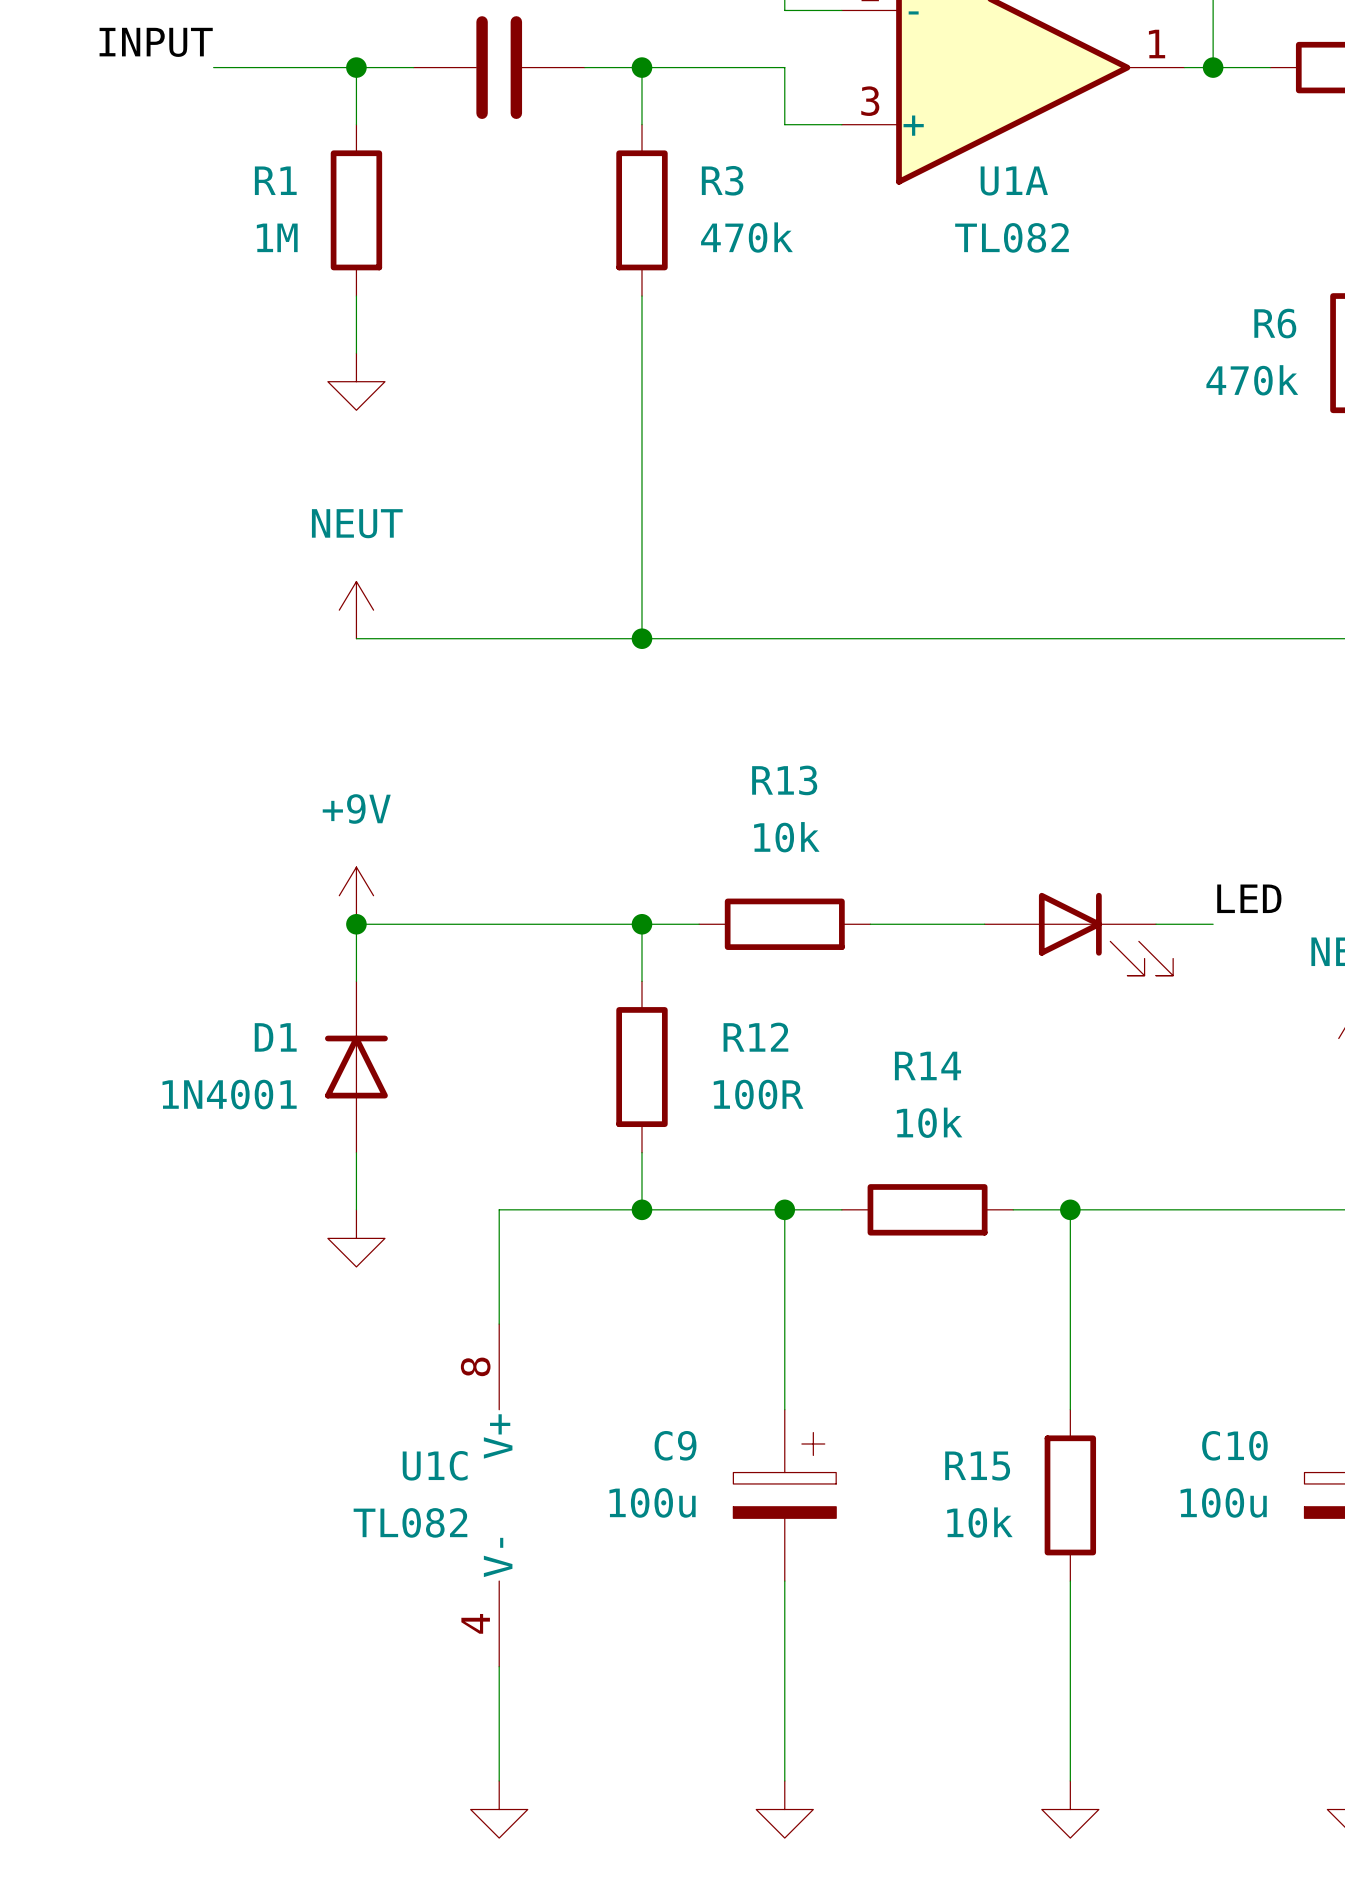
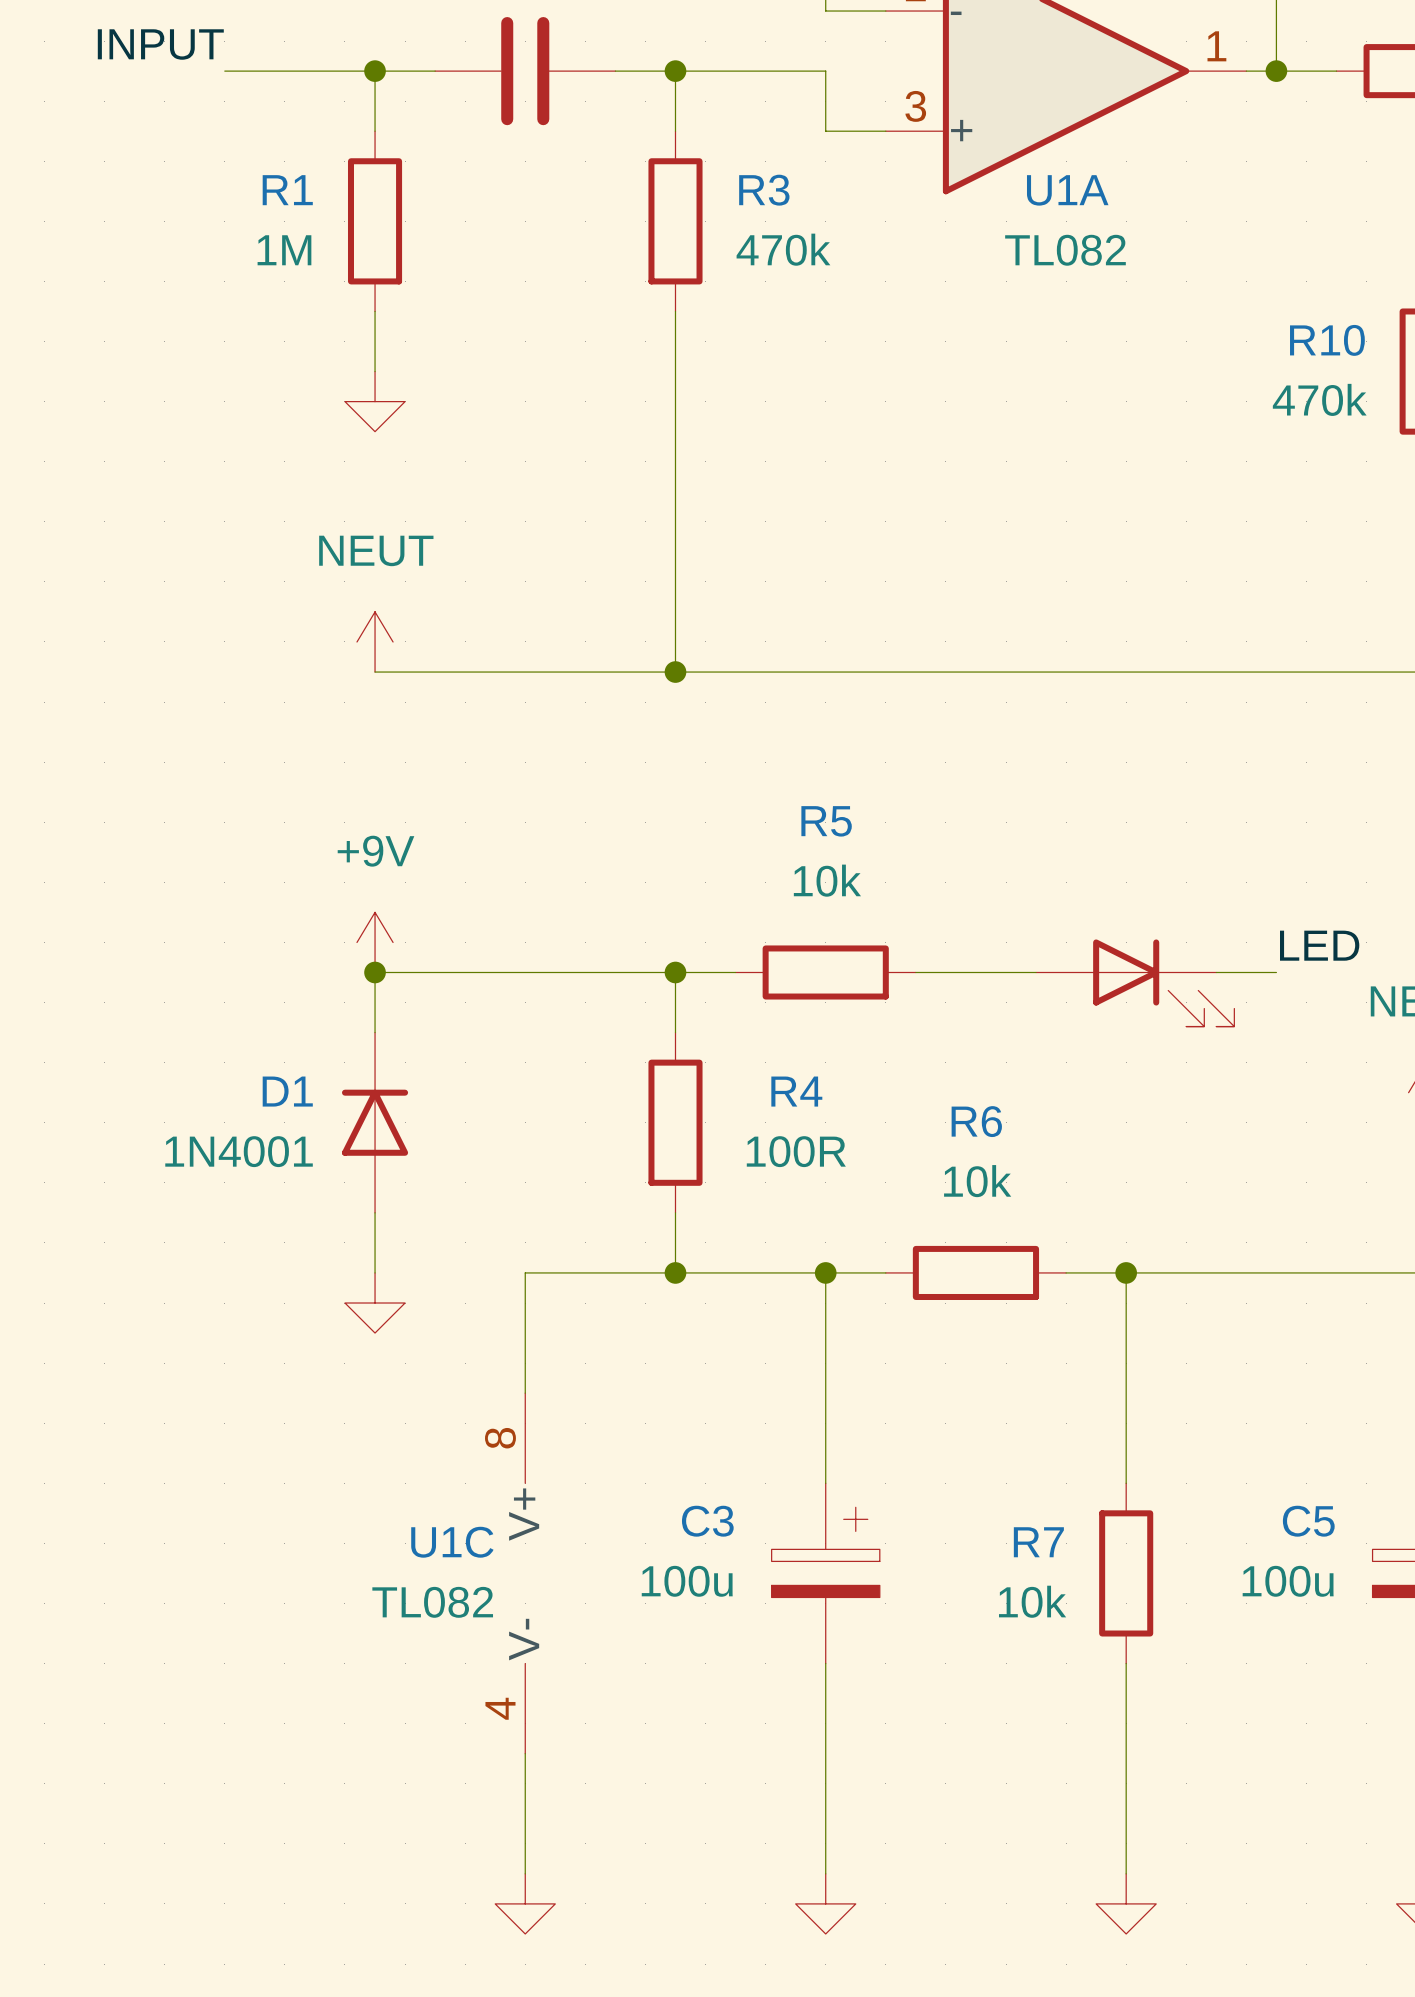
R6 name: R6 (1275, 323) -> R10 (1327, 340)
R13 name: R13 (784, 780) -> R5 (826, 821)
R12 name: R12 (755, 1037) -> R4 (796, 1091)
R14 name: R14 (927, 1065) -> R6 (976, 1121)
C9 name: C9 (675, 1445) -> C3 (707, 1521)
C10 name: C10 (1234, 1445) -> C5 (1308, 1521)
R15 name: R15 (977, 1466) -> R7 (1038, 1542)

